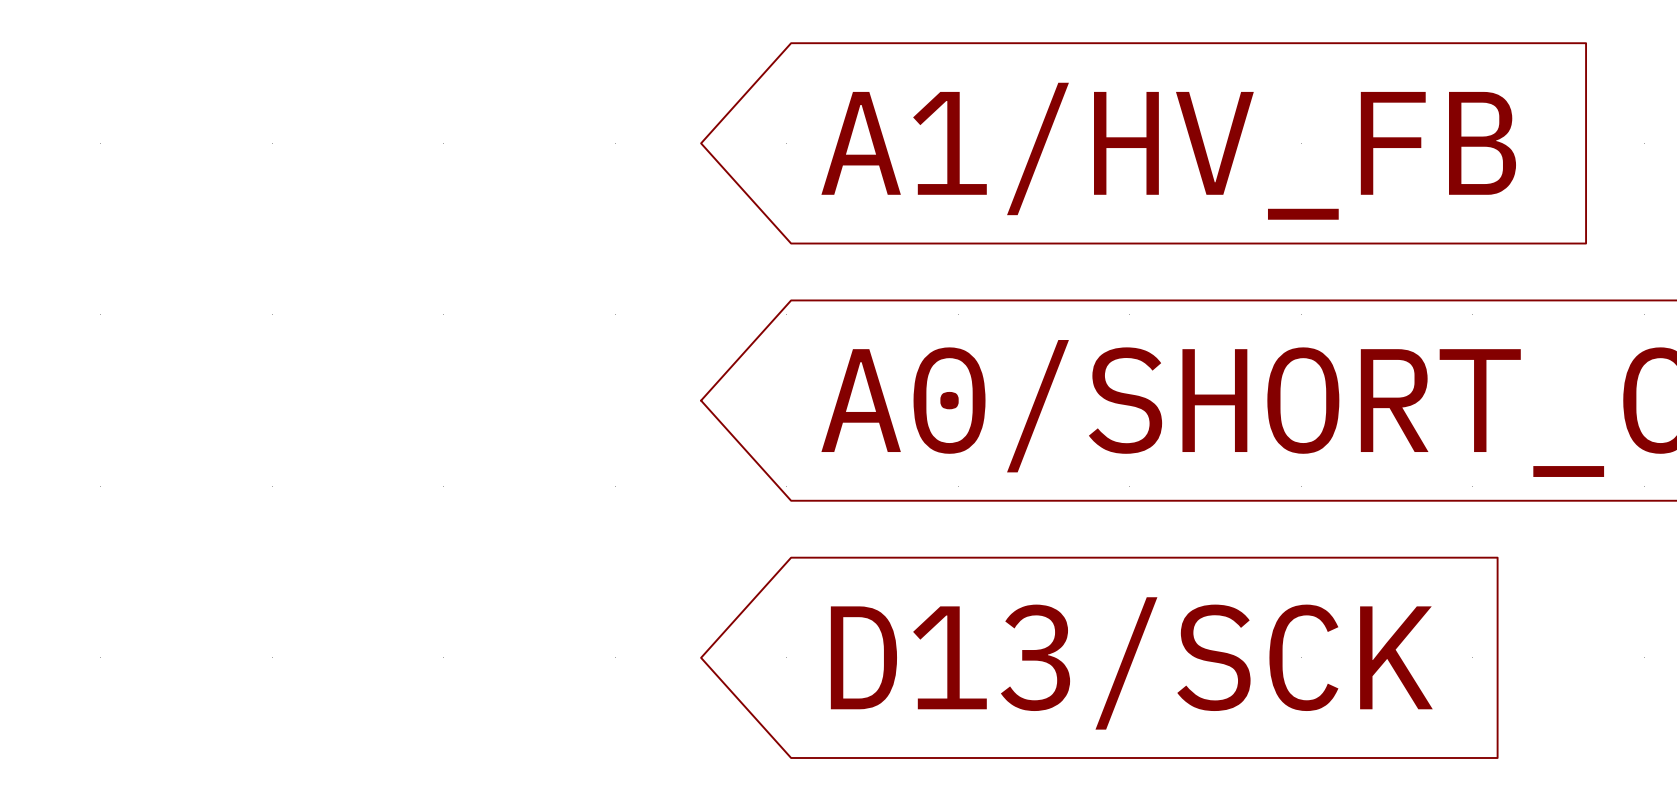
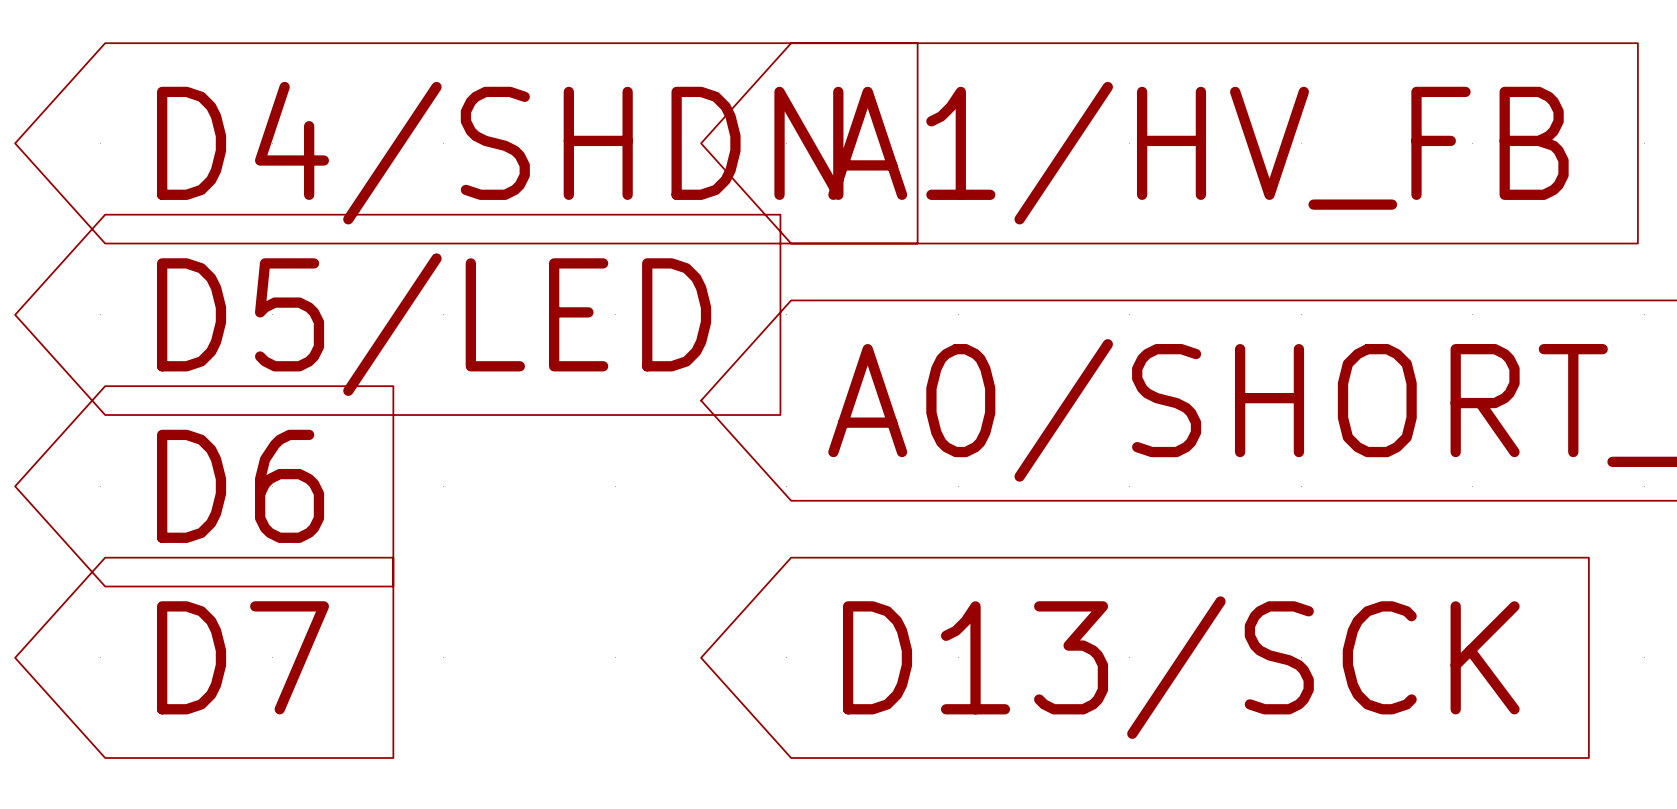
global label: none -> D4/SHDN (500, 153)
global label: none -> D5/LED (434, 324)
global label: none -> D6 (240, 486)
global label: none -> D7 (243, 657)

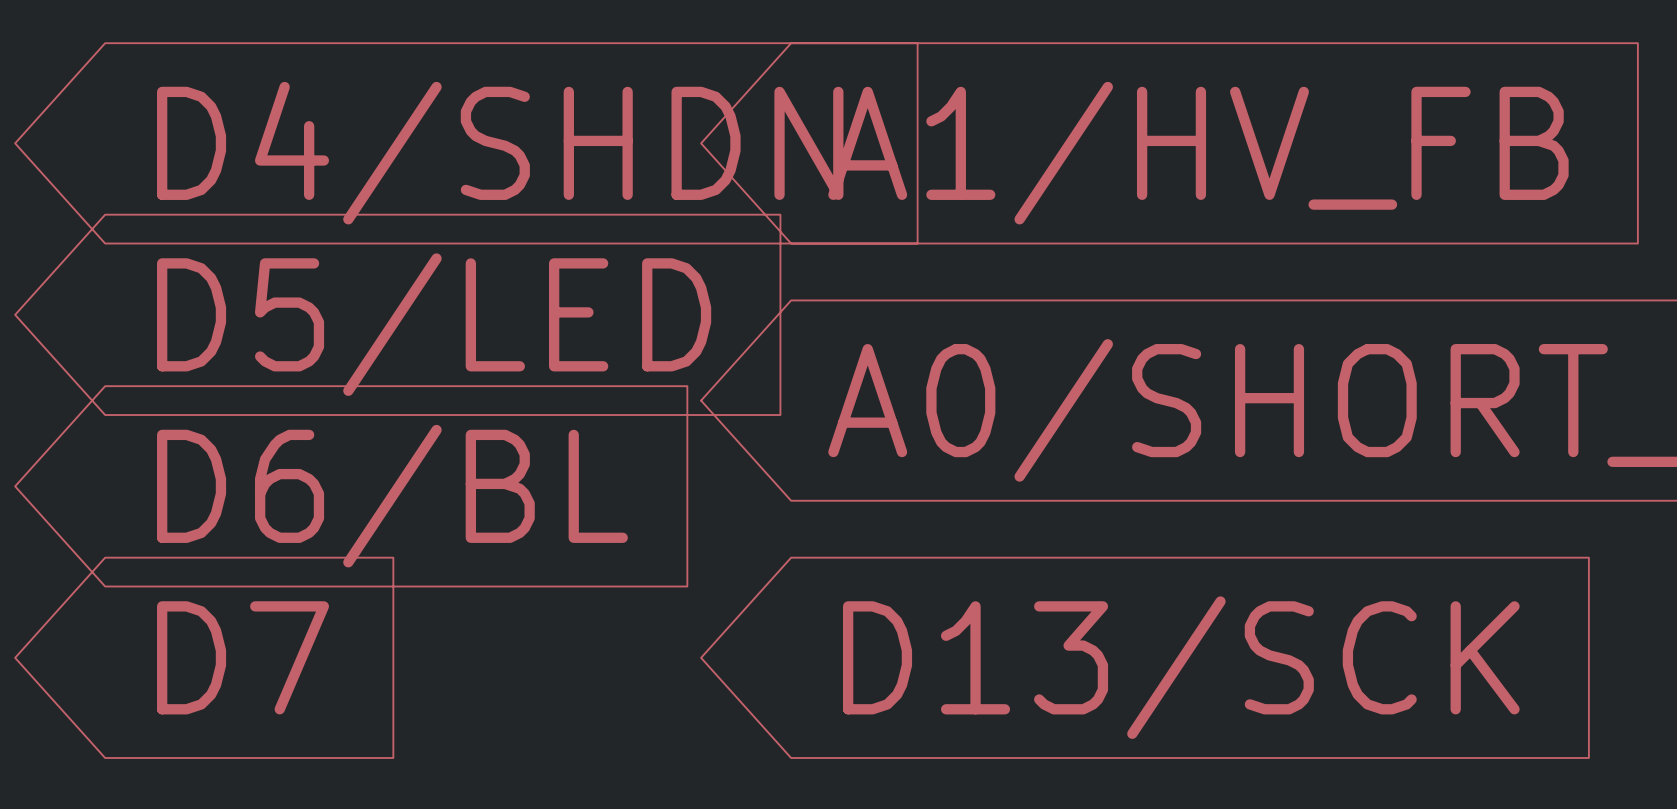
global label: D6 (240, 486) -> D6/BL (392, 496)

